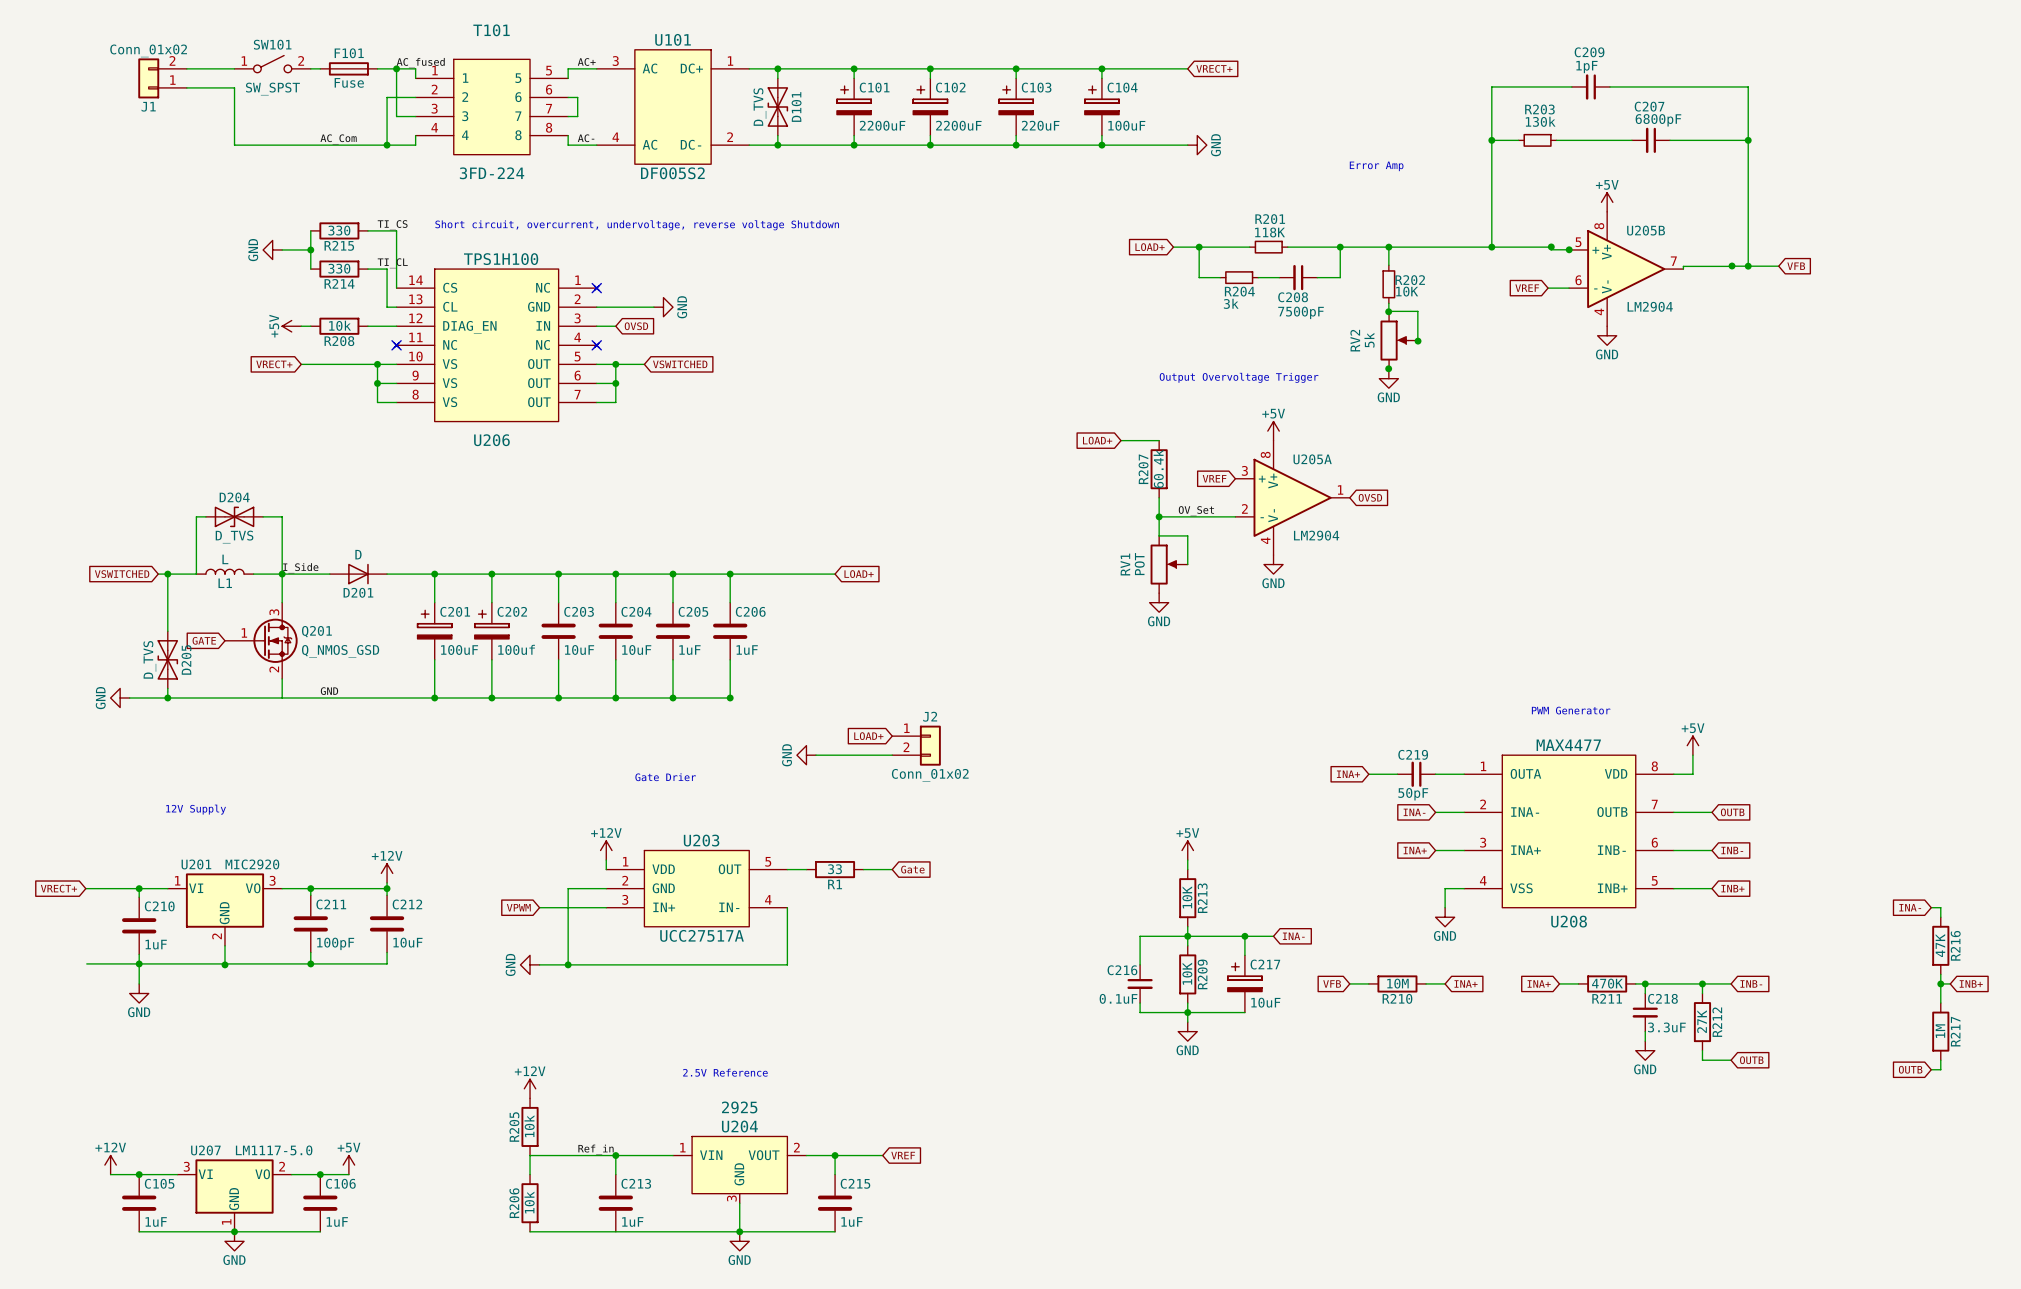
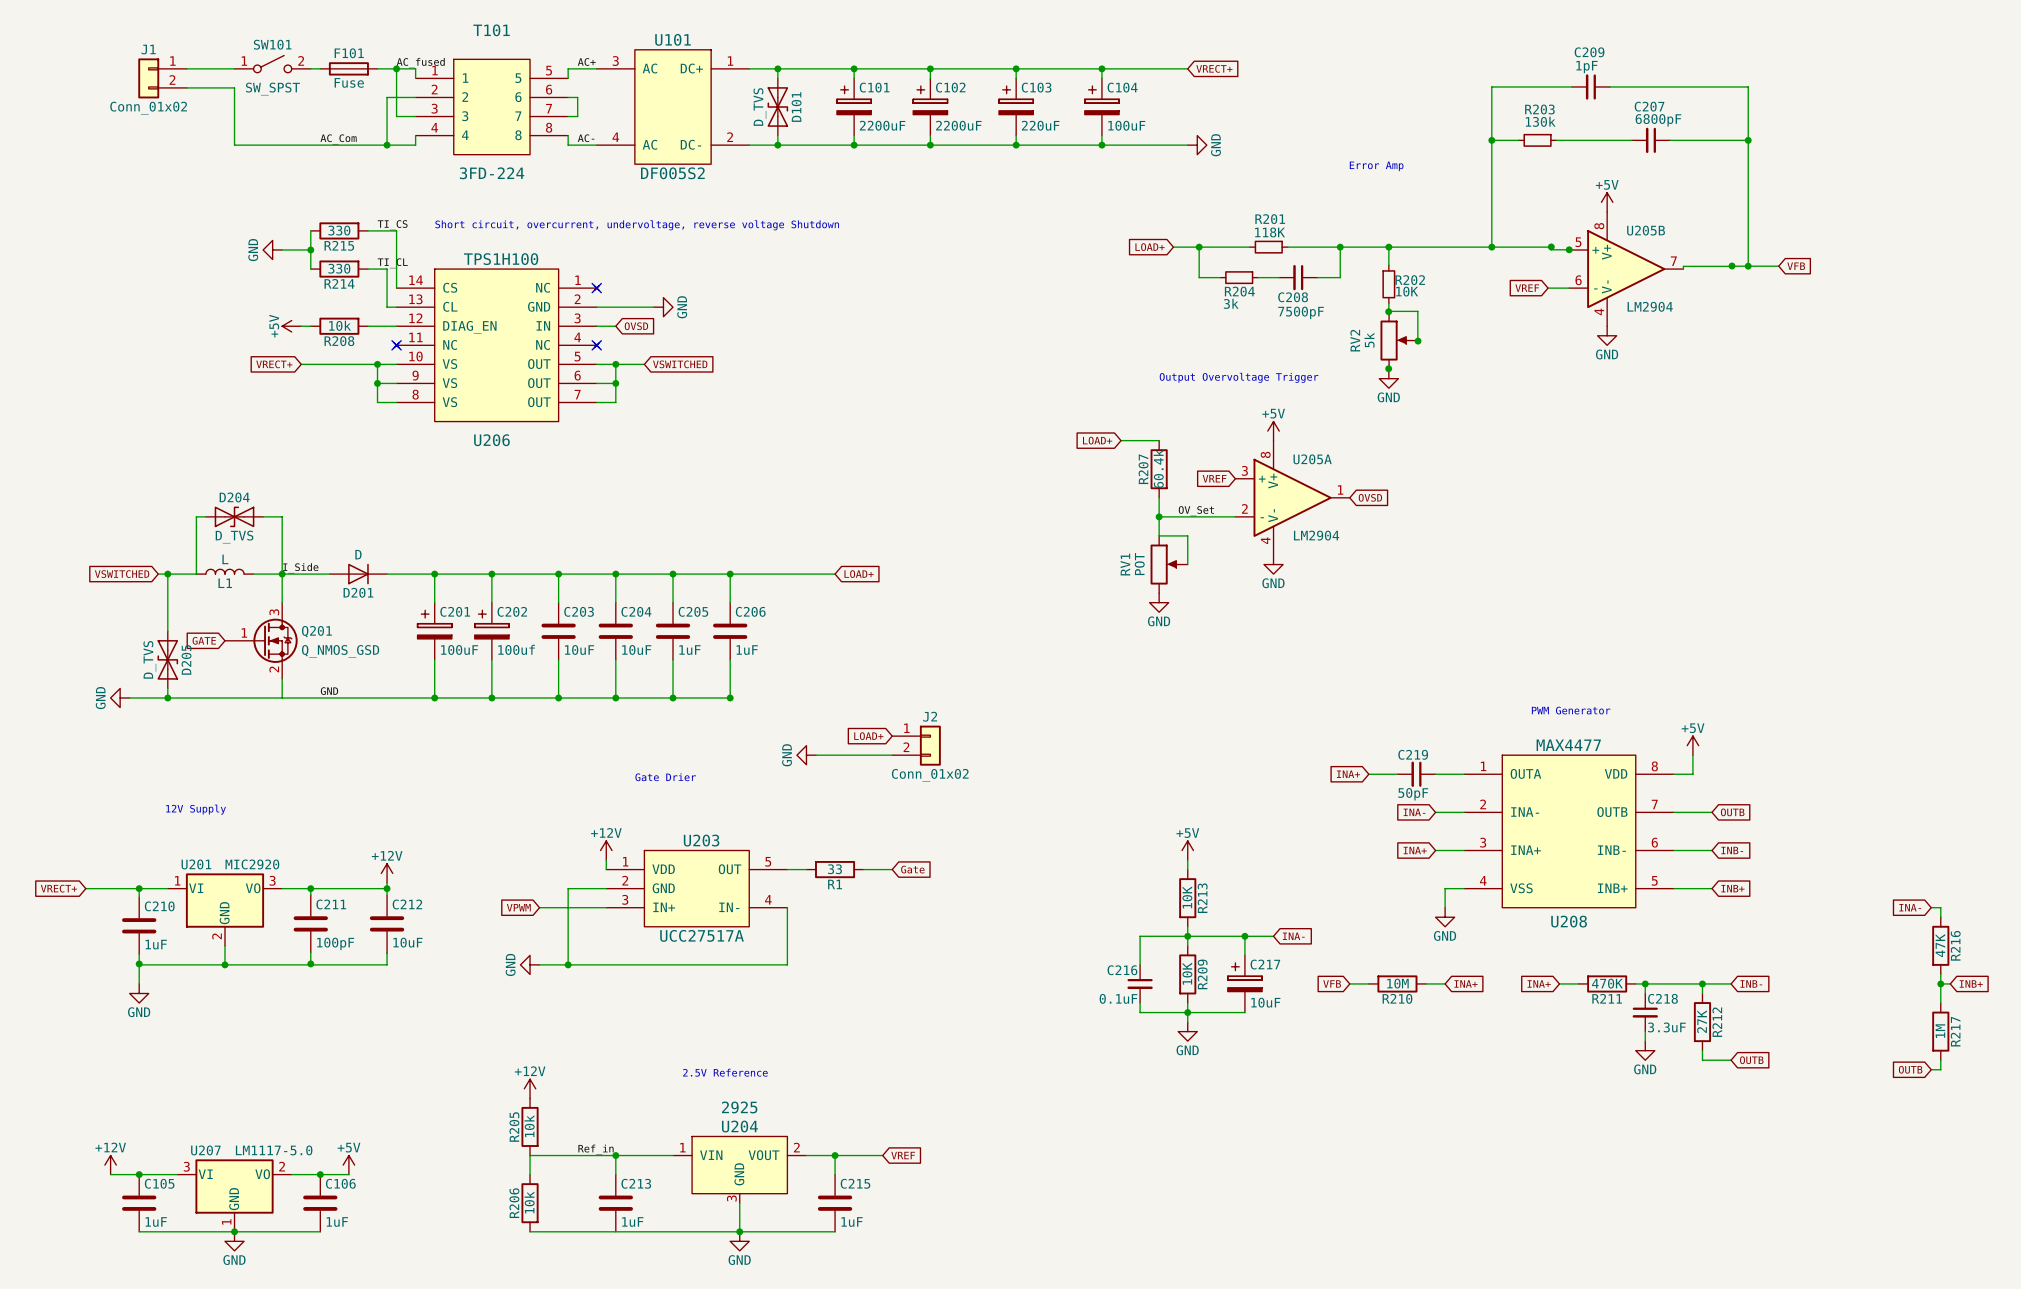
J1 flip: as is (148, 78) -> up-down (148, 78)
wire: (86, 963) (387, 963) -> (139, 963) (387, 963)

